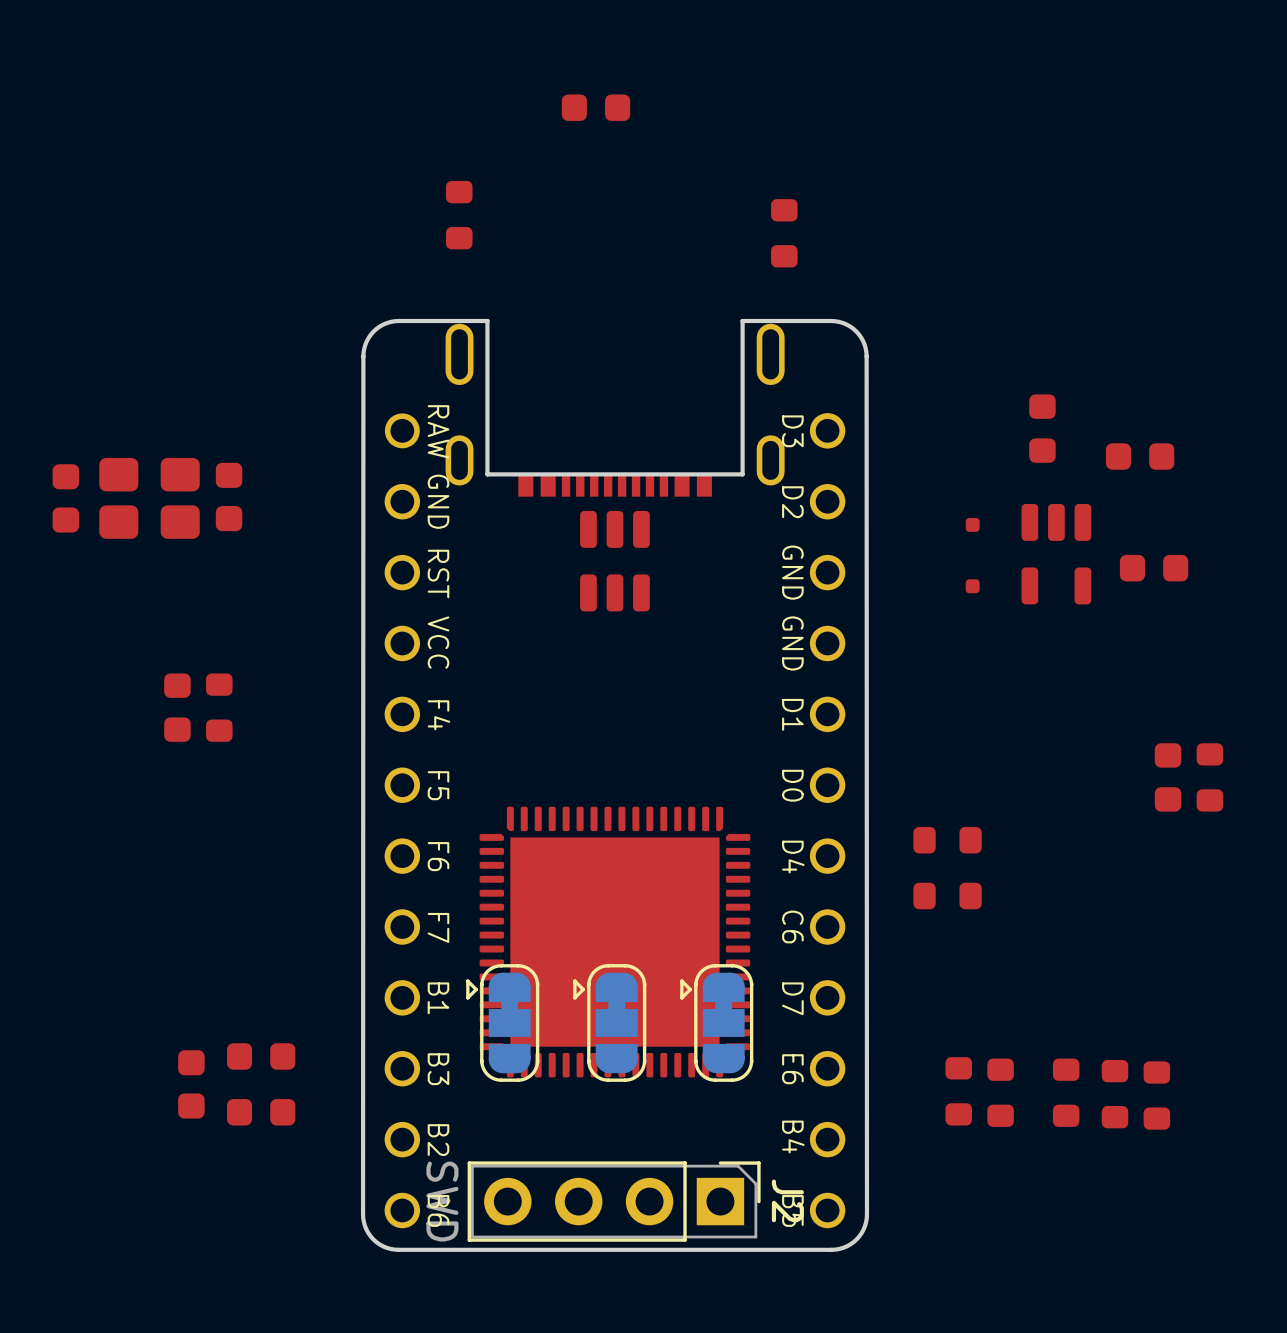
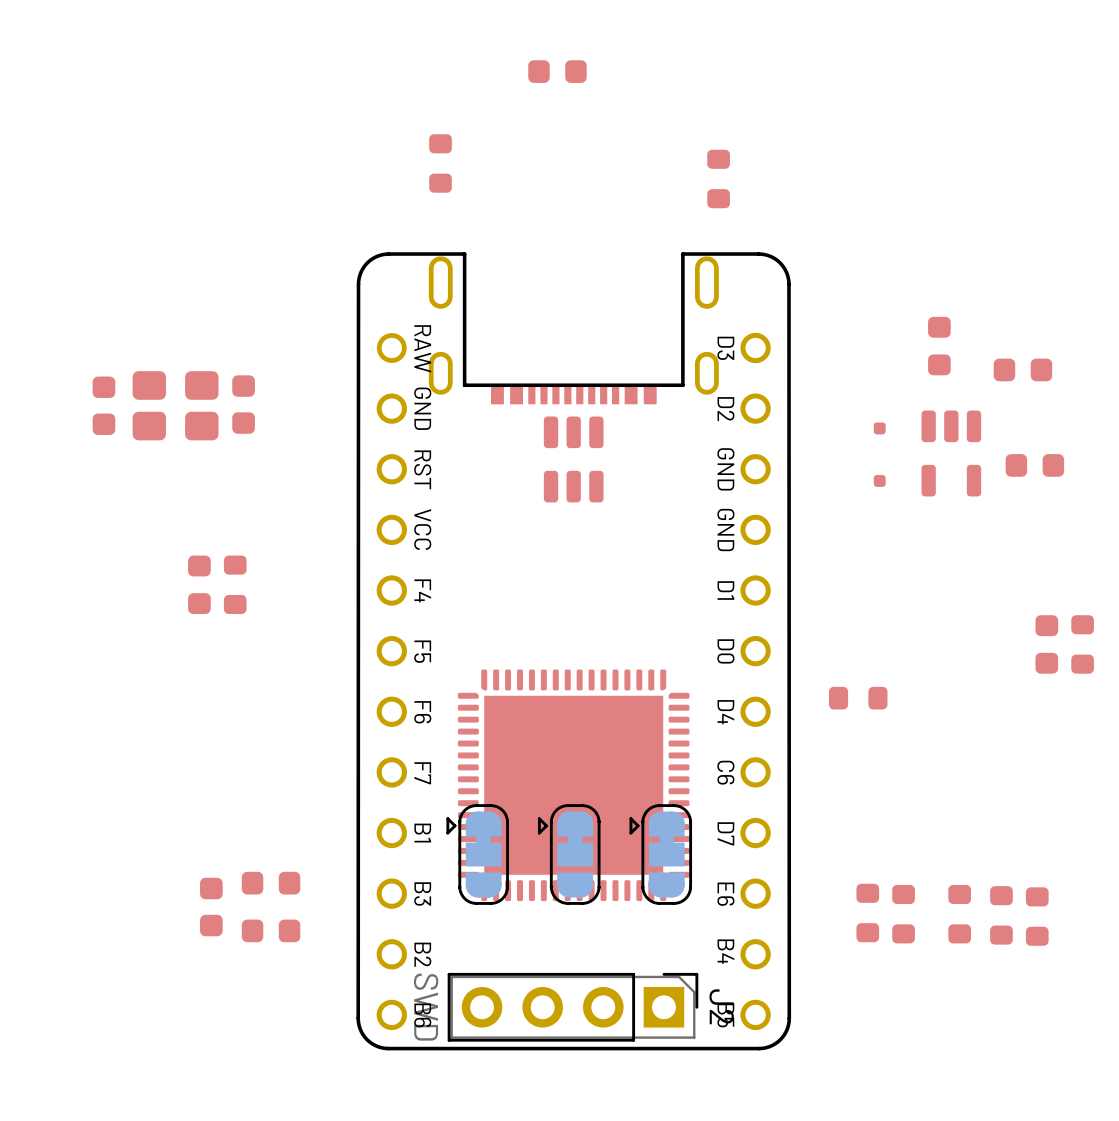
part: (947, 896) -> none

